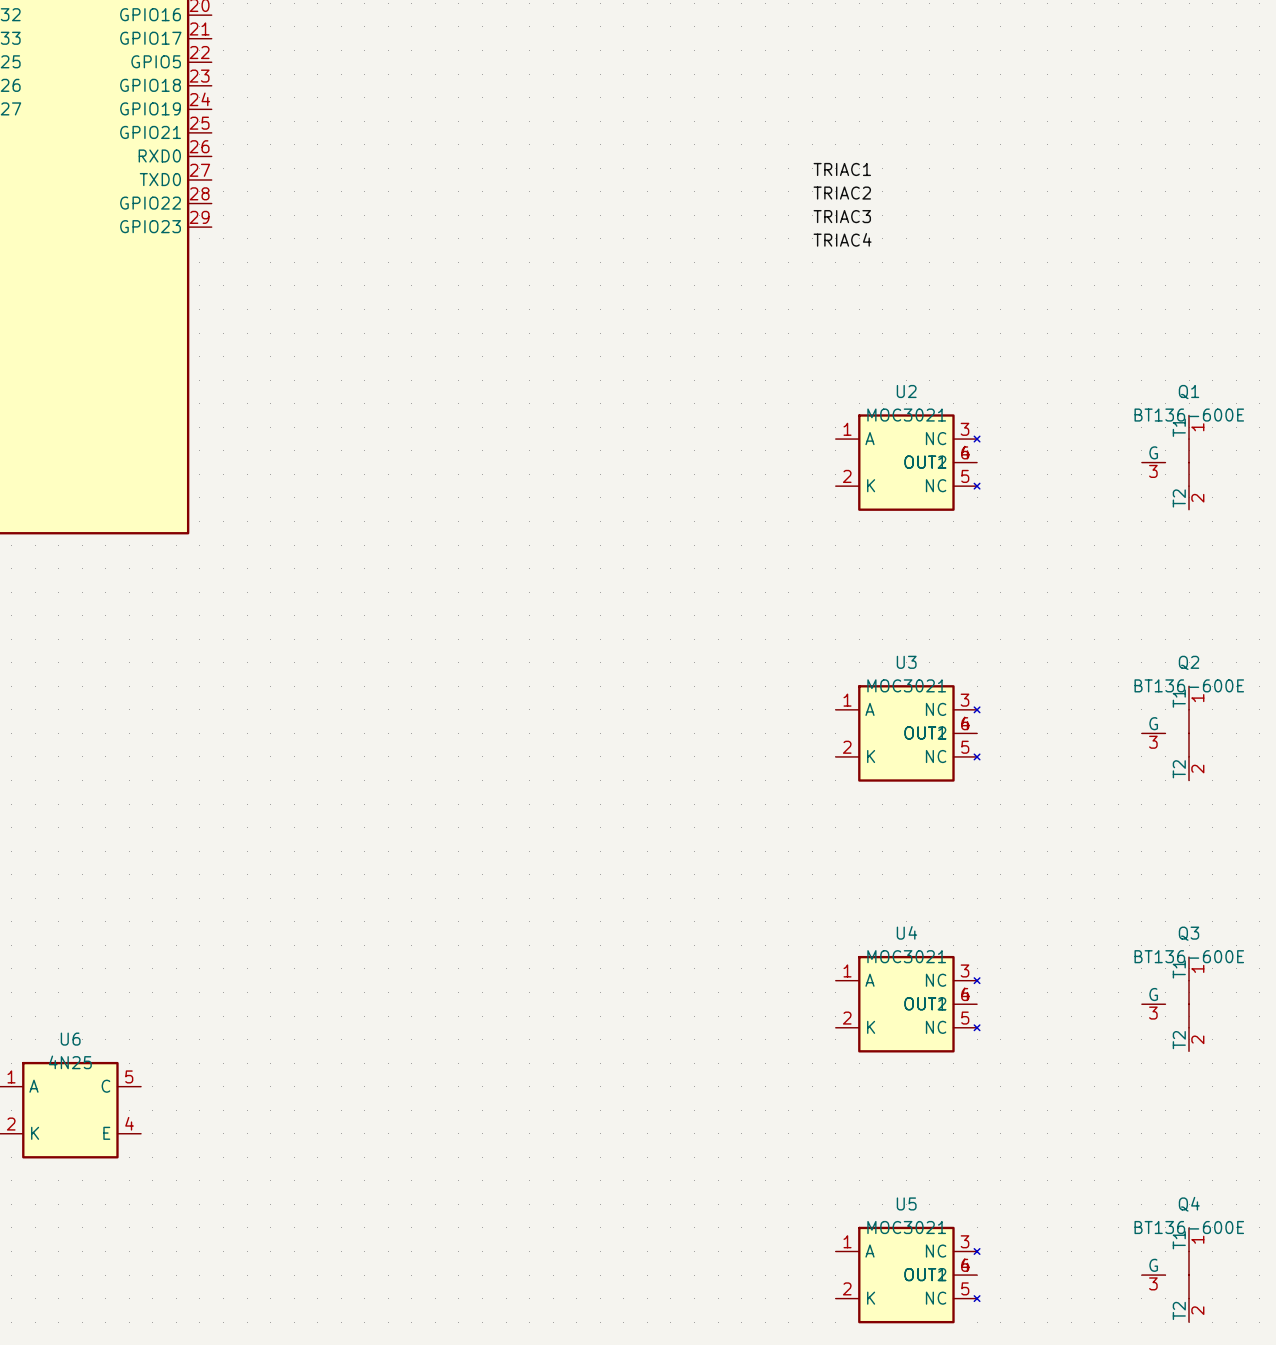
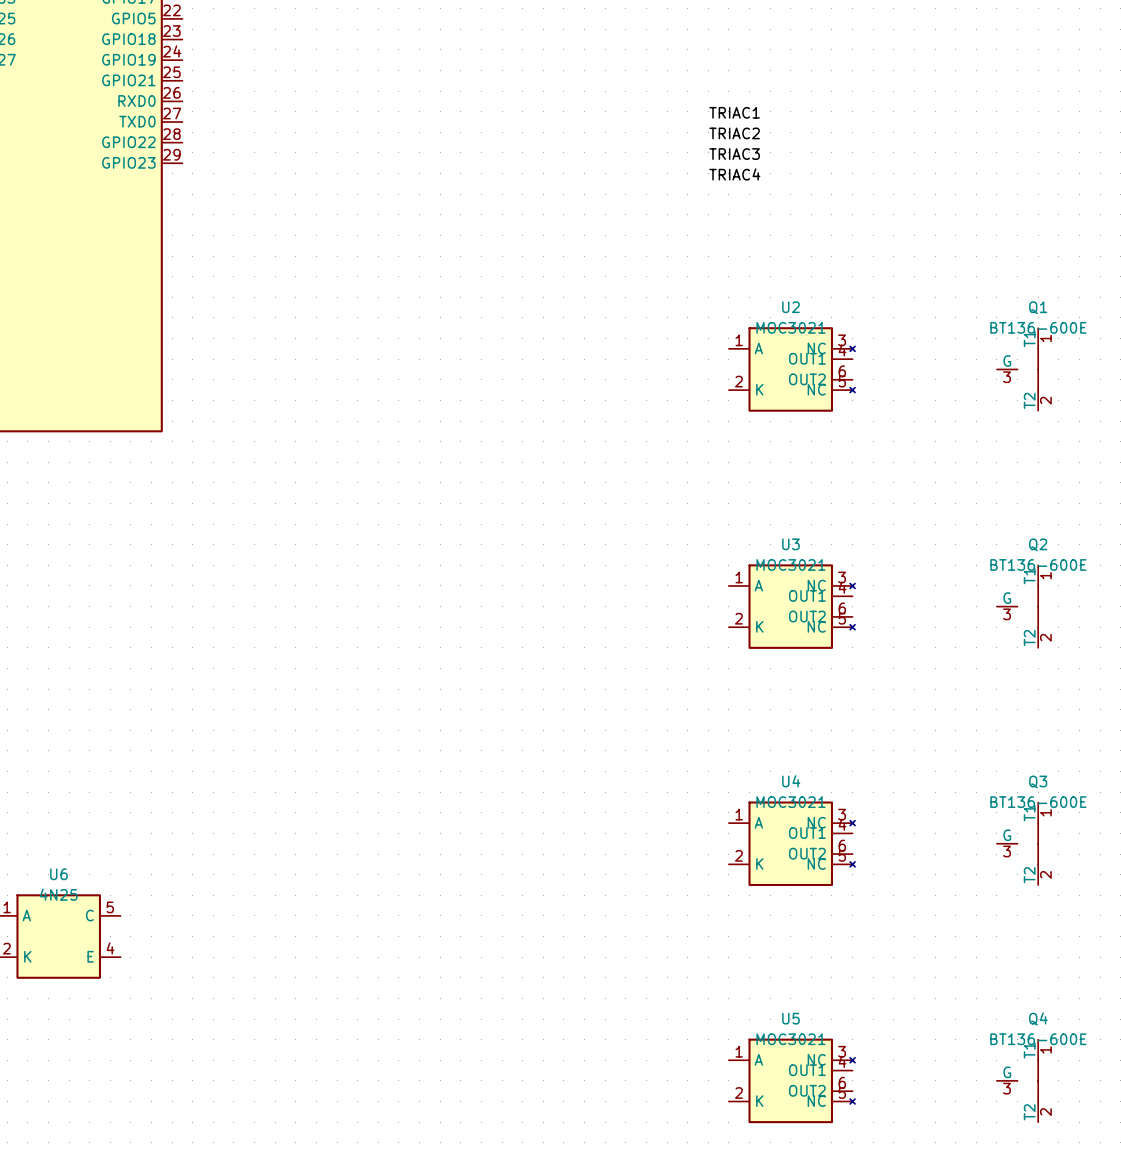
U2 symbol: [835, 414, 980, 511] -> [728, 327, 856, 412]
U3 symbol: [835, 685, 980, 782] -> [728, 564, 856, 649]
U4 symbol: [835, 955, 980, 1053] -> [728, 801, 856, 887]
U5 symbol: [835, 1226, 980, 1324] -> [728, 1038, 856, 1124]

